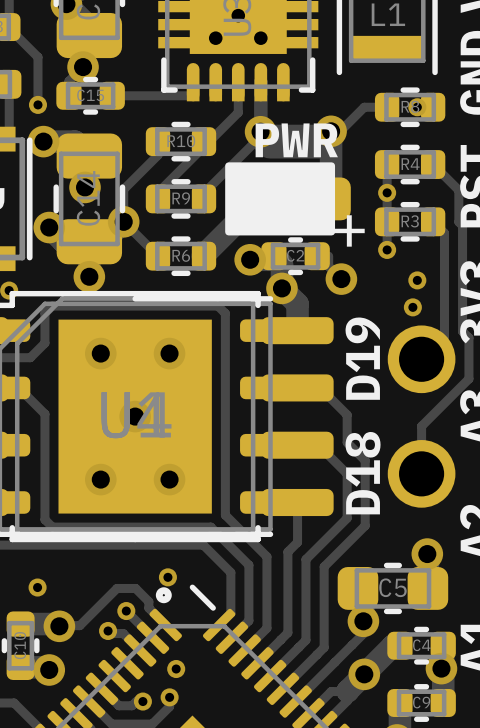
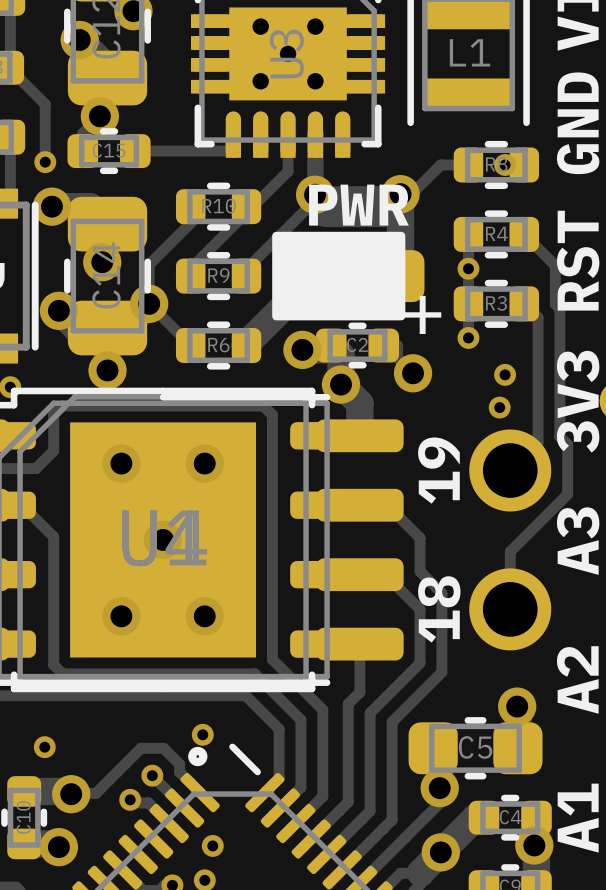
text: D19 (362, 358) -> 19 (438, 470)
text: D18 (363, 473) -> 18 (439, 609)

